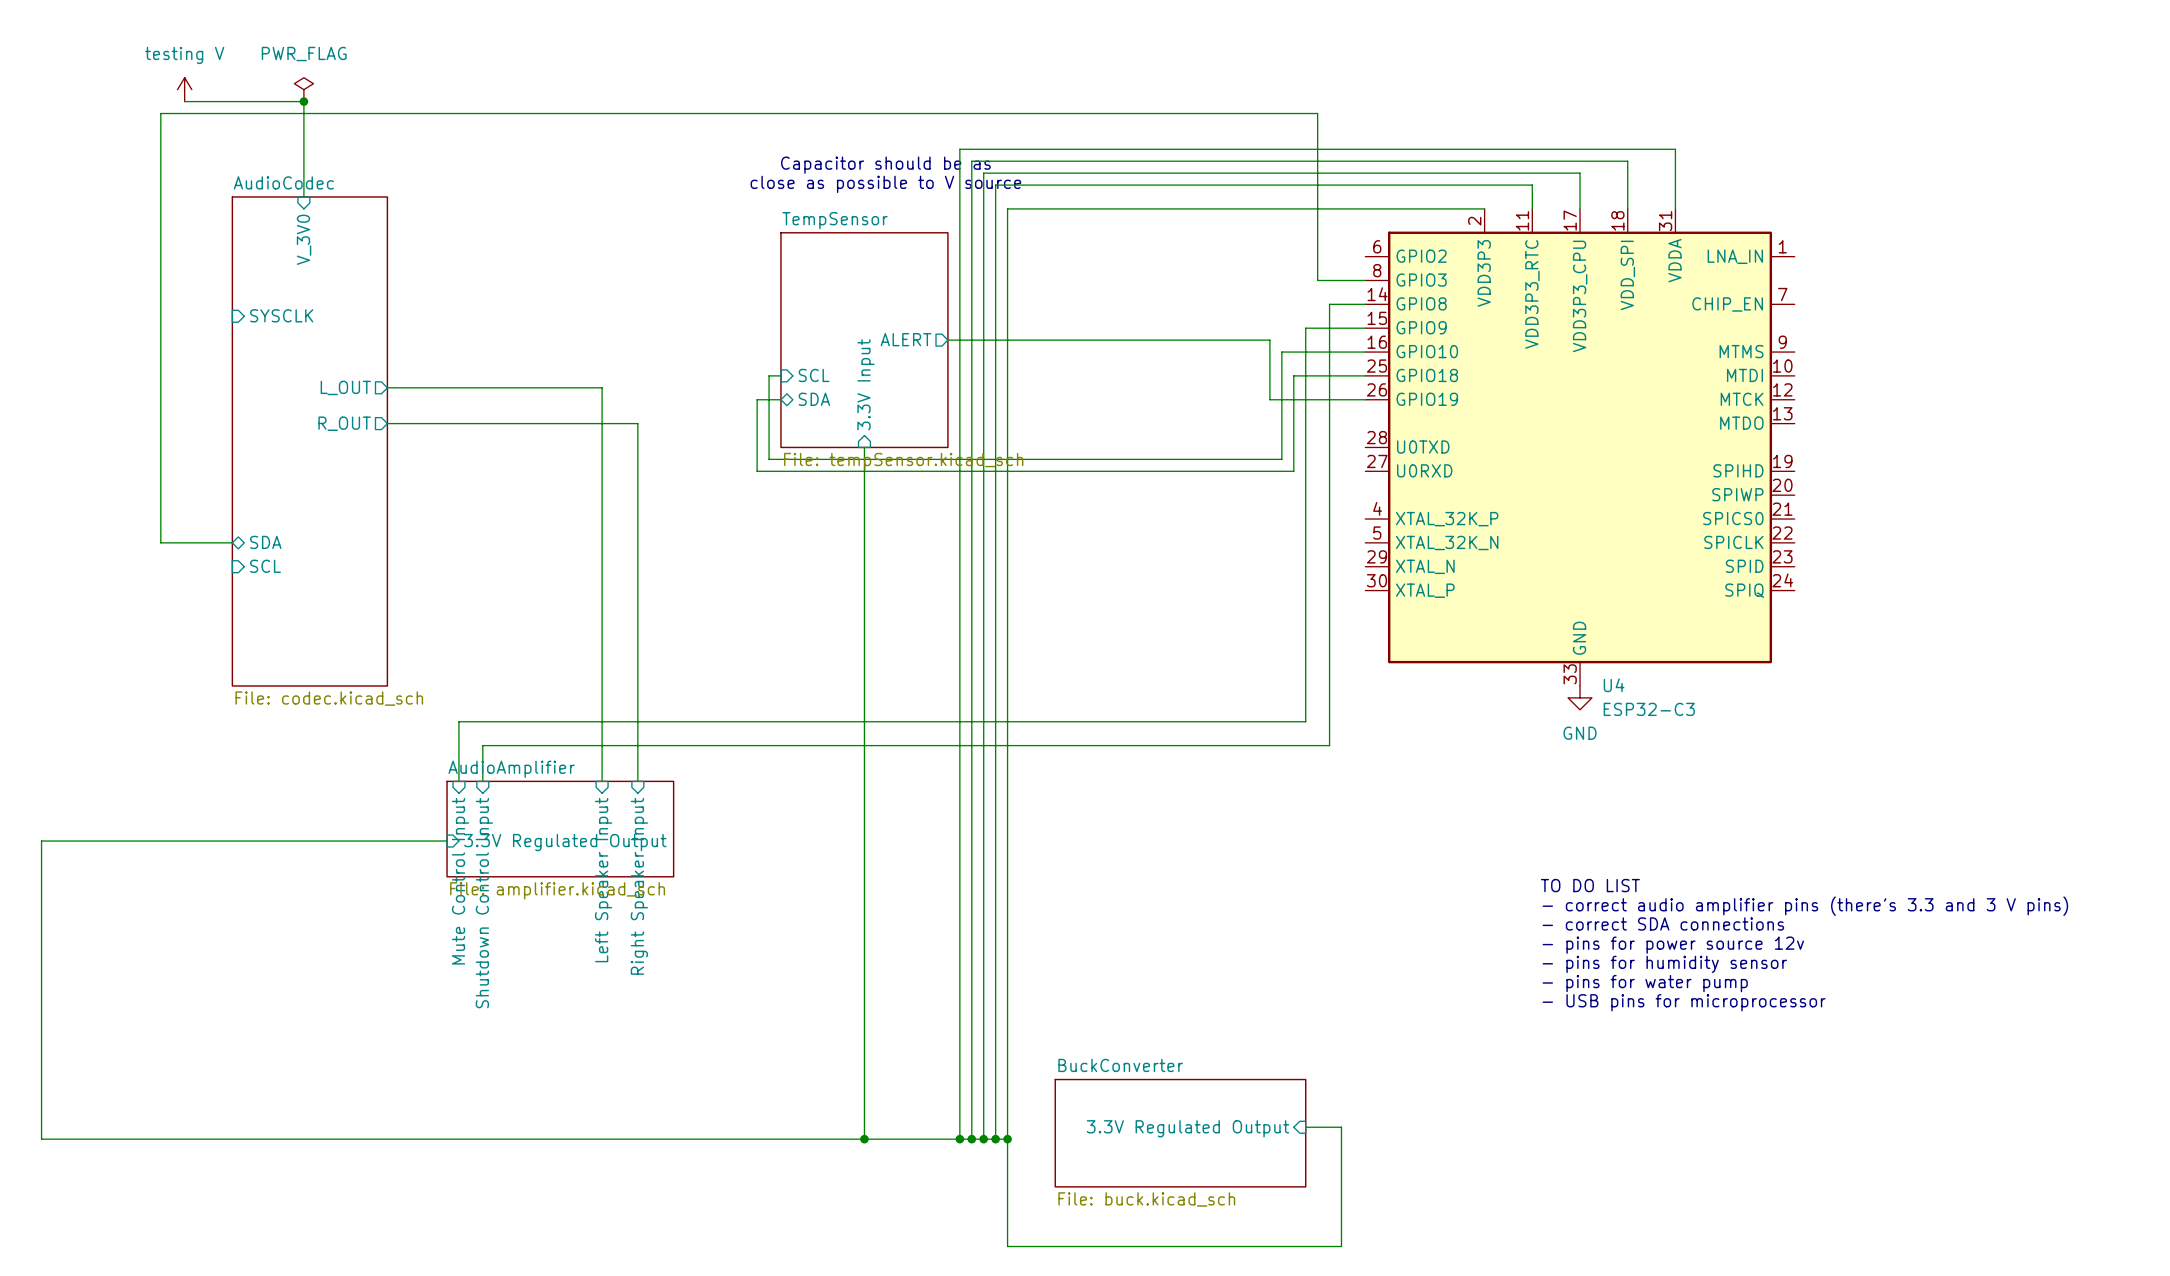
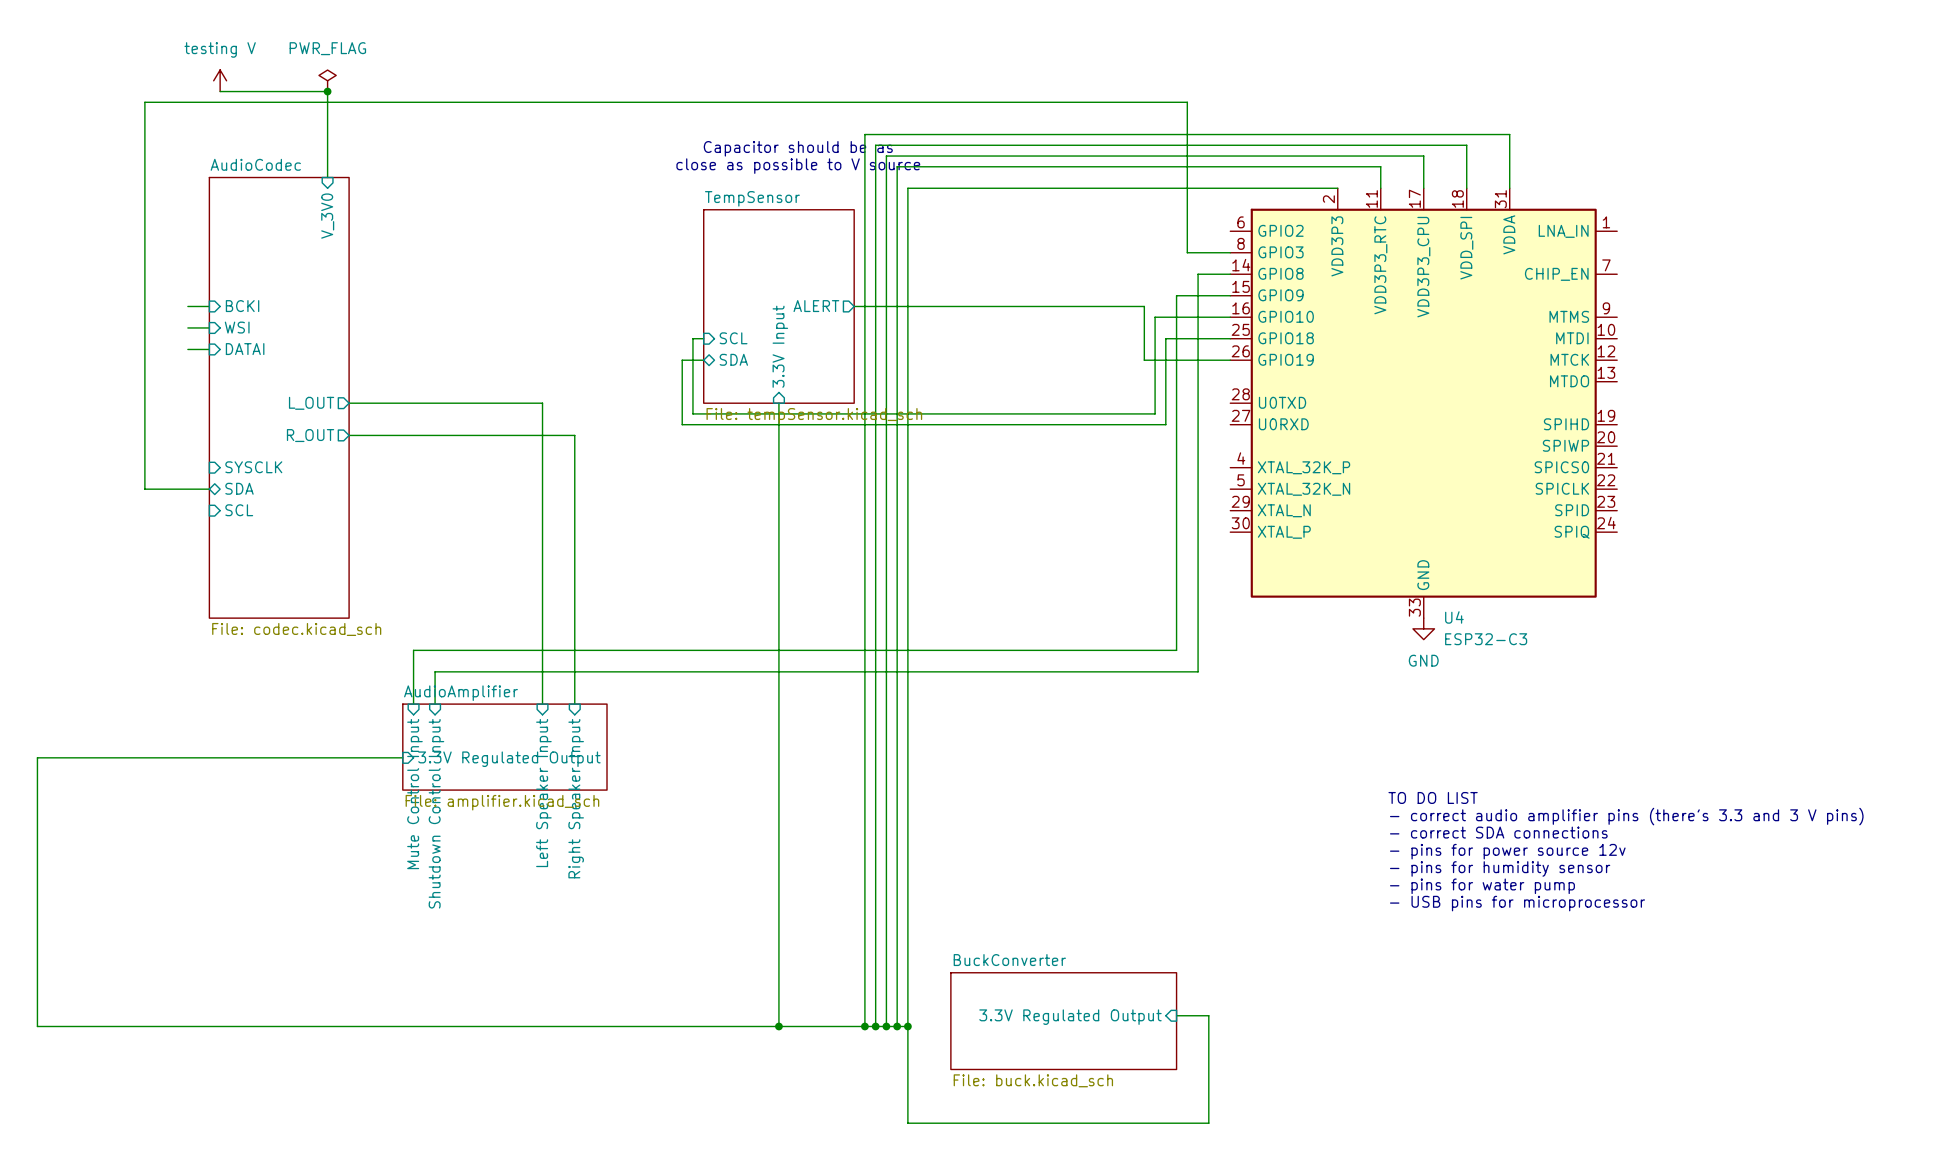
power symbol position: testing V (184, 89) -> testing V (220, 80)
power symbol position: PWR_FLAG (303, 89) -> PWR_FLAG (327, 80)
wire: (184, 101) (244, 101) -> none
wire: (303, 101) (303, 197) -> (273, 91) (327, 91) (327, 177)
junction: (303, 101) -> none
junction: none -> (327, 91)
sheet pin position: V_3V0 (304, 239) -> V_3V0 (327, 216)
sheet pin position: SYSCLK (281, 315) -> SYSCLK (253, 467)
sheet pin: none -> BCKI (242, 306)
wire: none -> (187, 306) (209, 306)
wire: none -> (187, 327) (209, 327)
sheet pin: none -> WSI (237, 327)
wire: none -> (187, 349) (209, 349)
sheet pin: none -> DATAI (245, 349)
sheet pin position: L_OUT (345, 387) -> L_OUT (311, 403)
wire: (387, 387) (602, 387) (602, 447) -> (349, 403) (542, 403)
sheet pin position: R_OUT (344, 423) -> R_OUT (310, 435)
wire: (387, 423) (637, 423) (637, 483) -> (349, 435) (574, 435)

